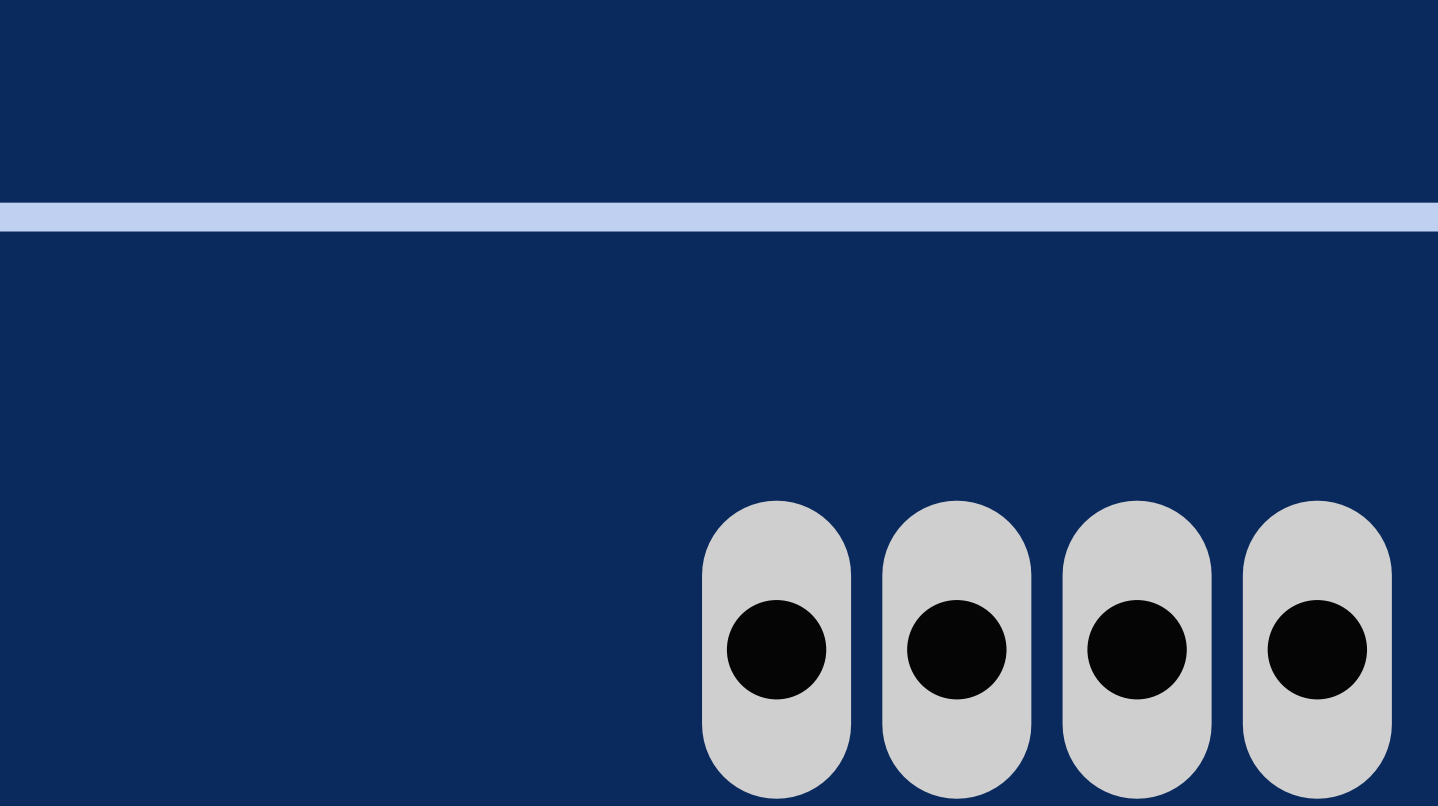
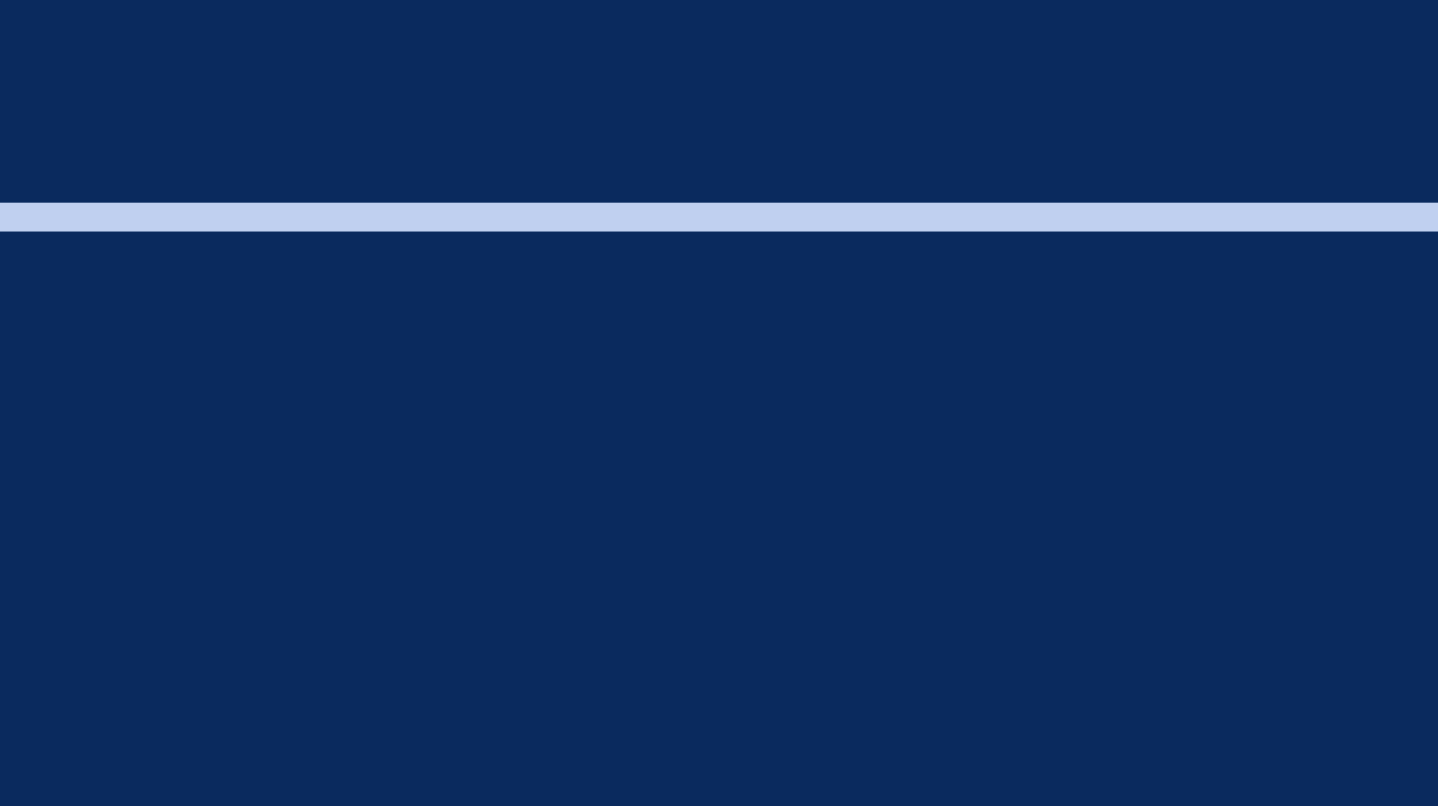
part: (1046, 649) -> none

